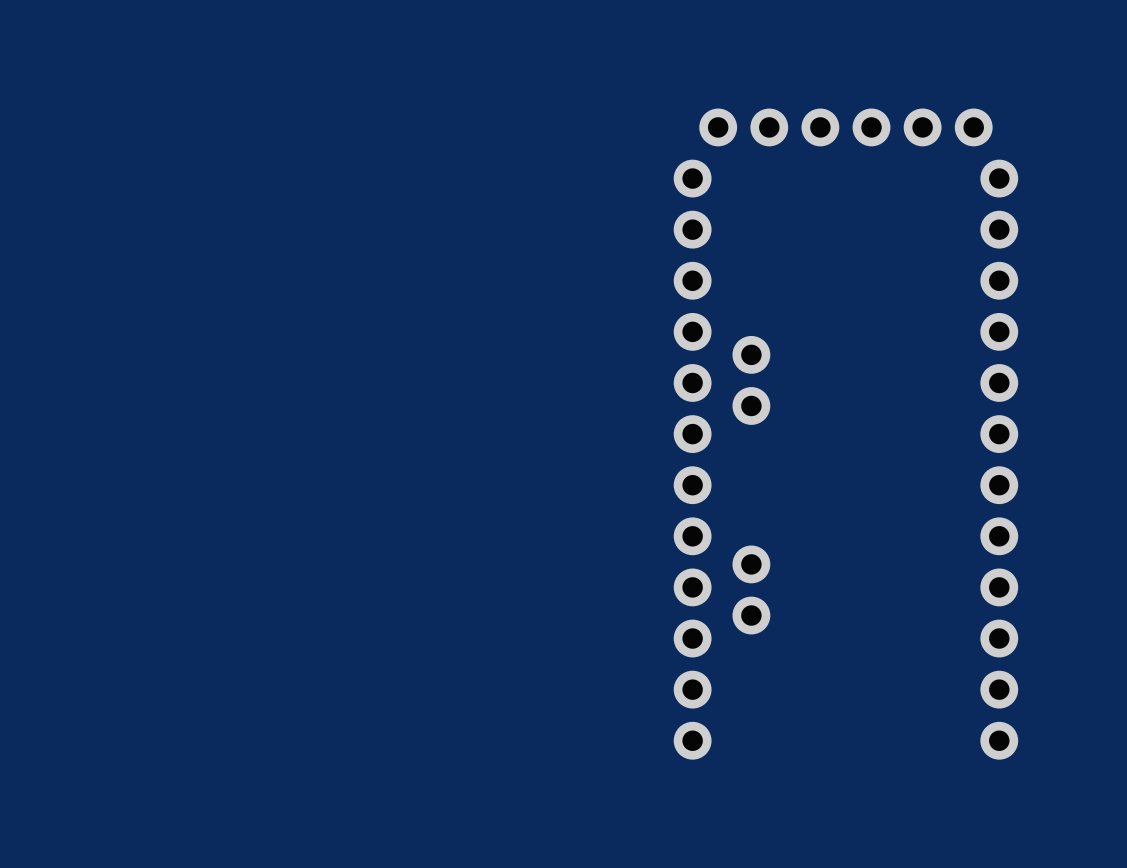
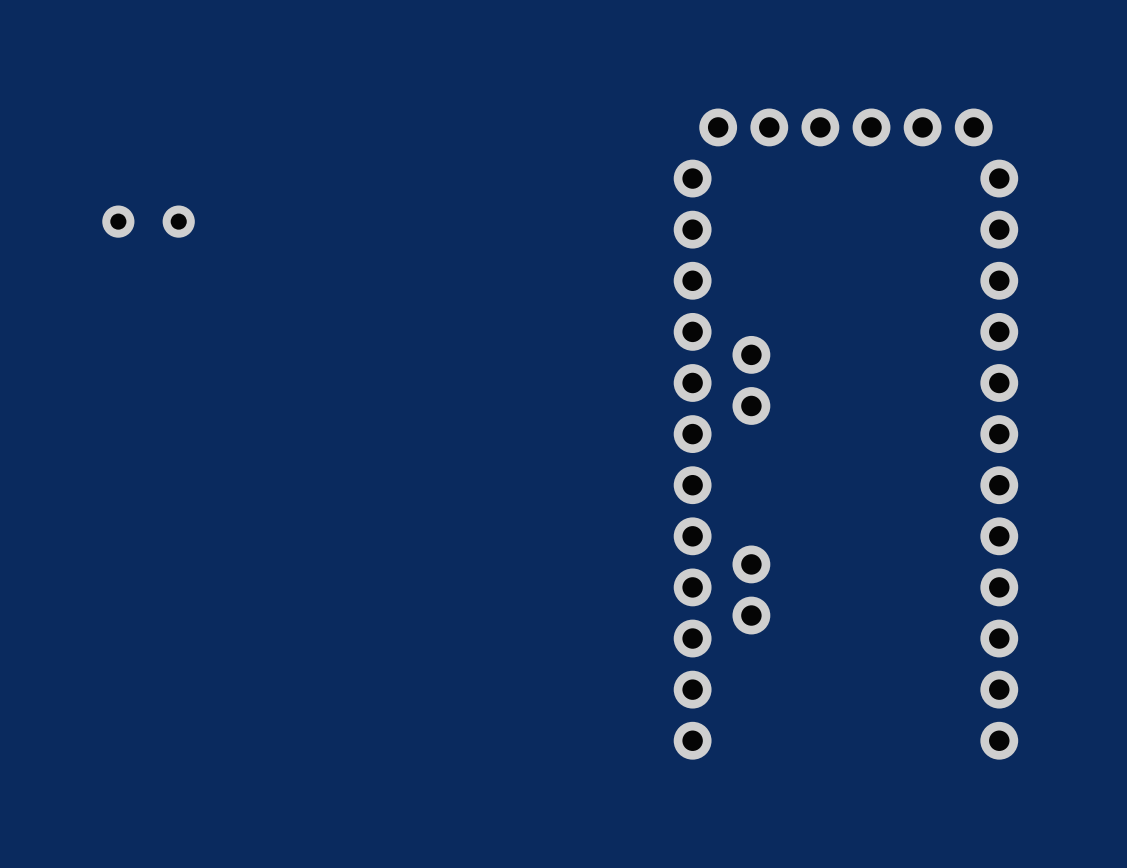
part: none -> (148, 221)

